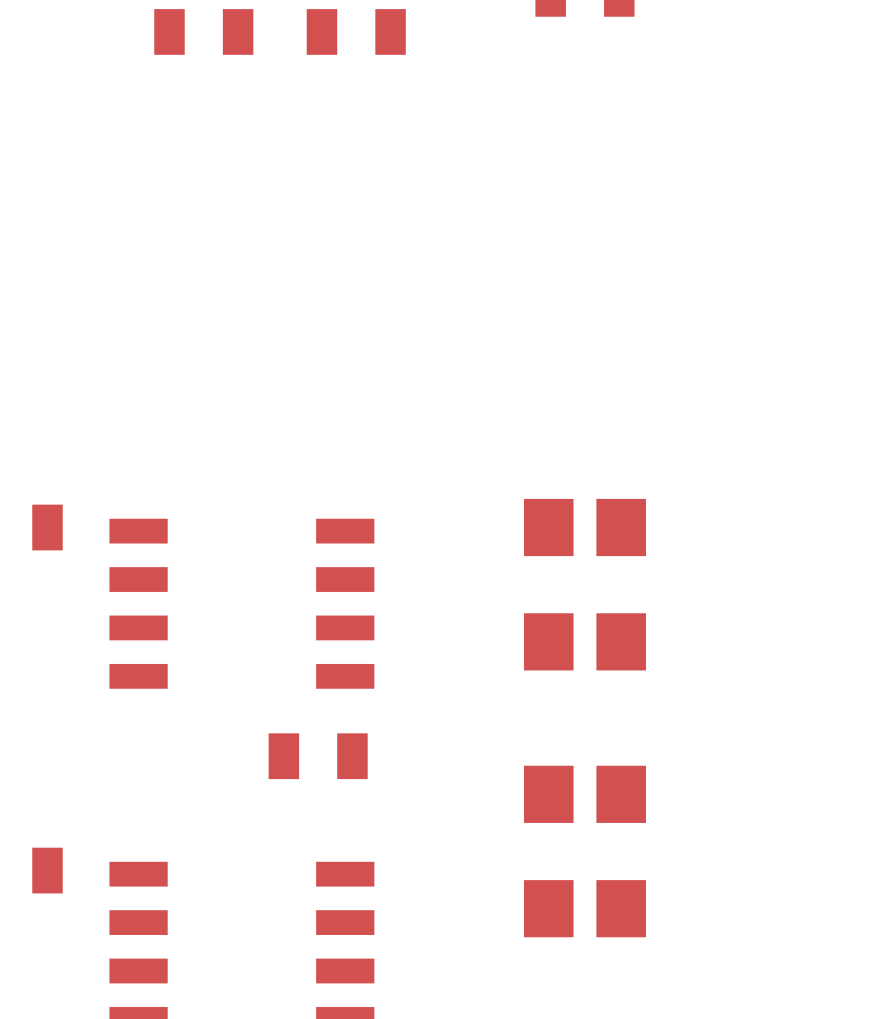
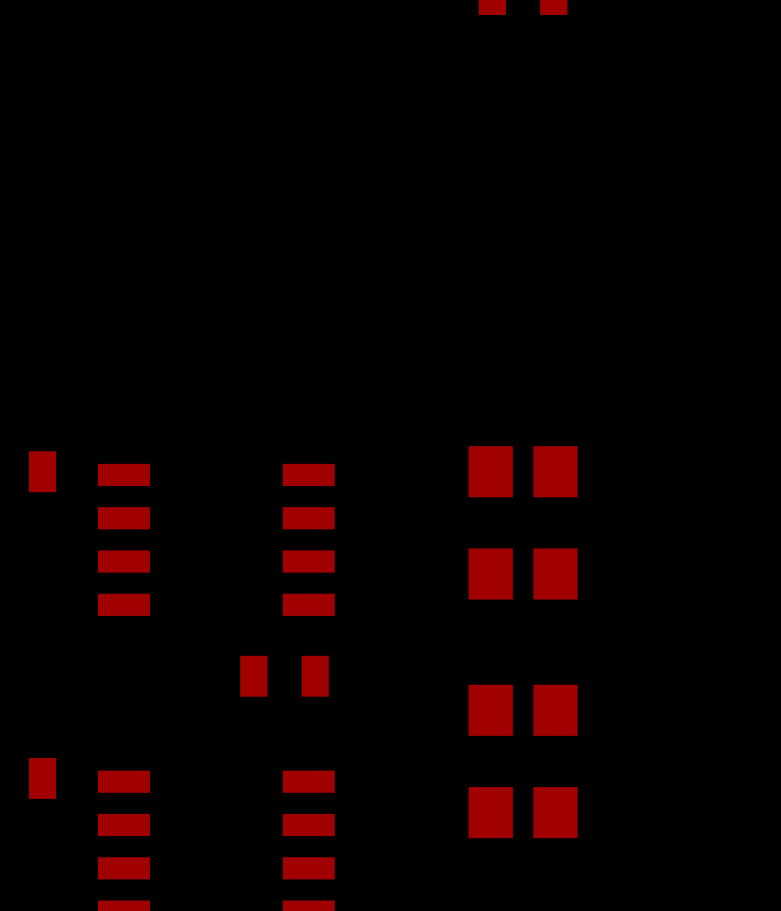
part: (203, 31) -> none
part: (356, 31) -> none

